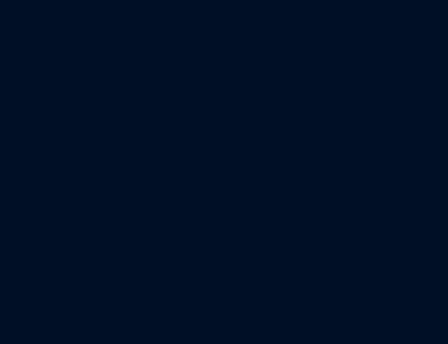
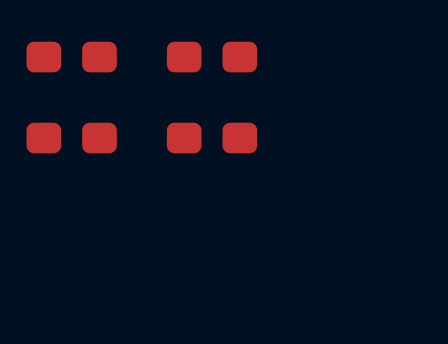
part: none -> (71, 57)
part: none -> (211, 57)
part: none -> (71, 138)
part: none -> (211, 138)

